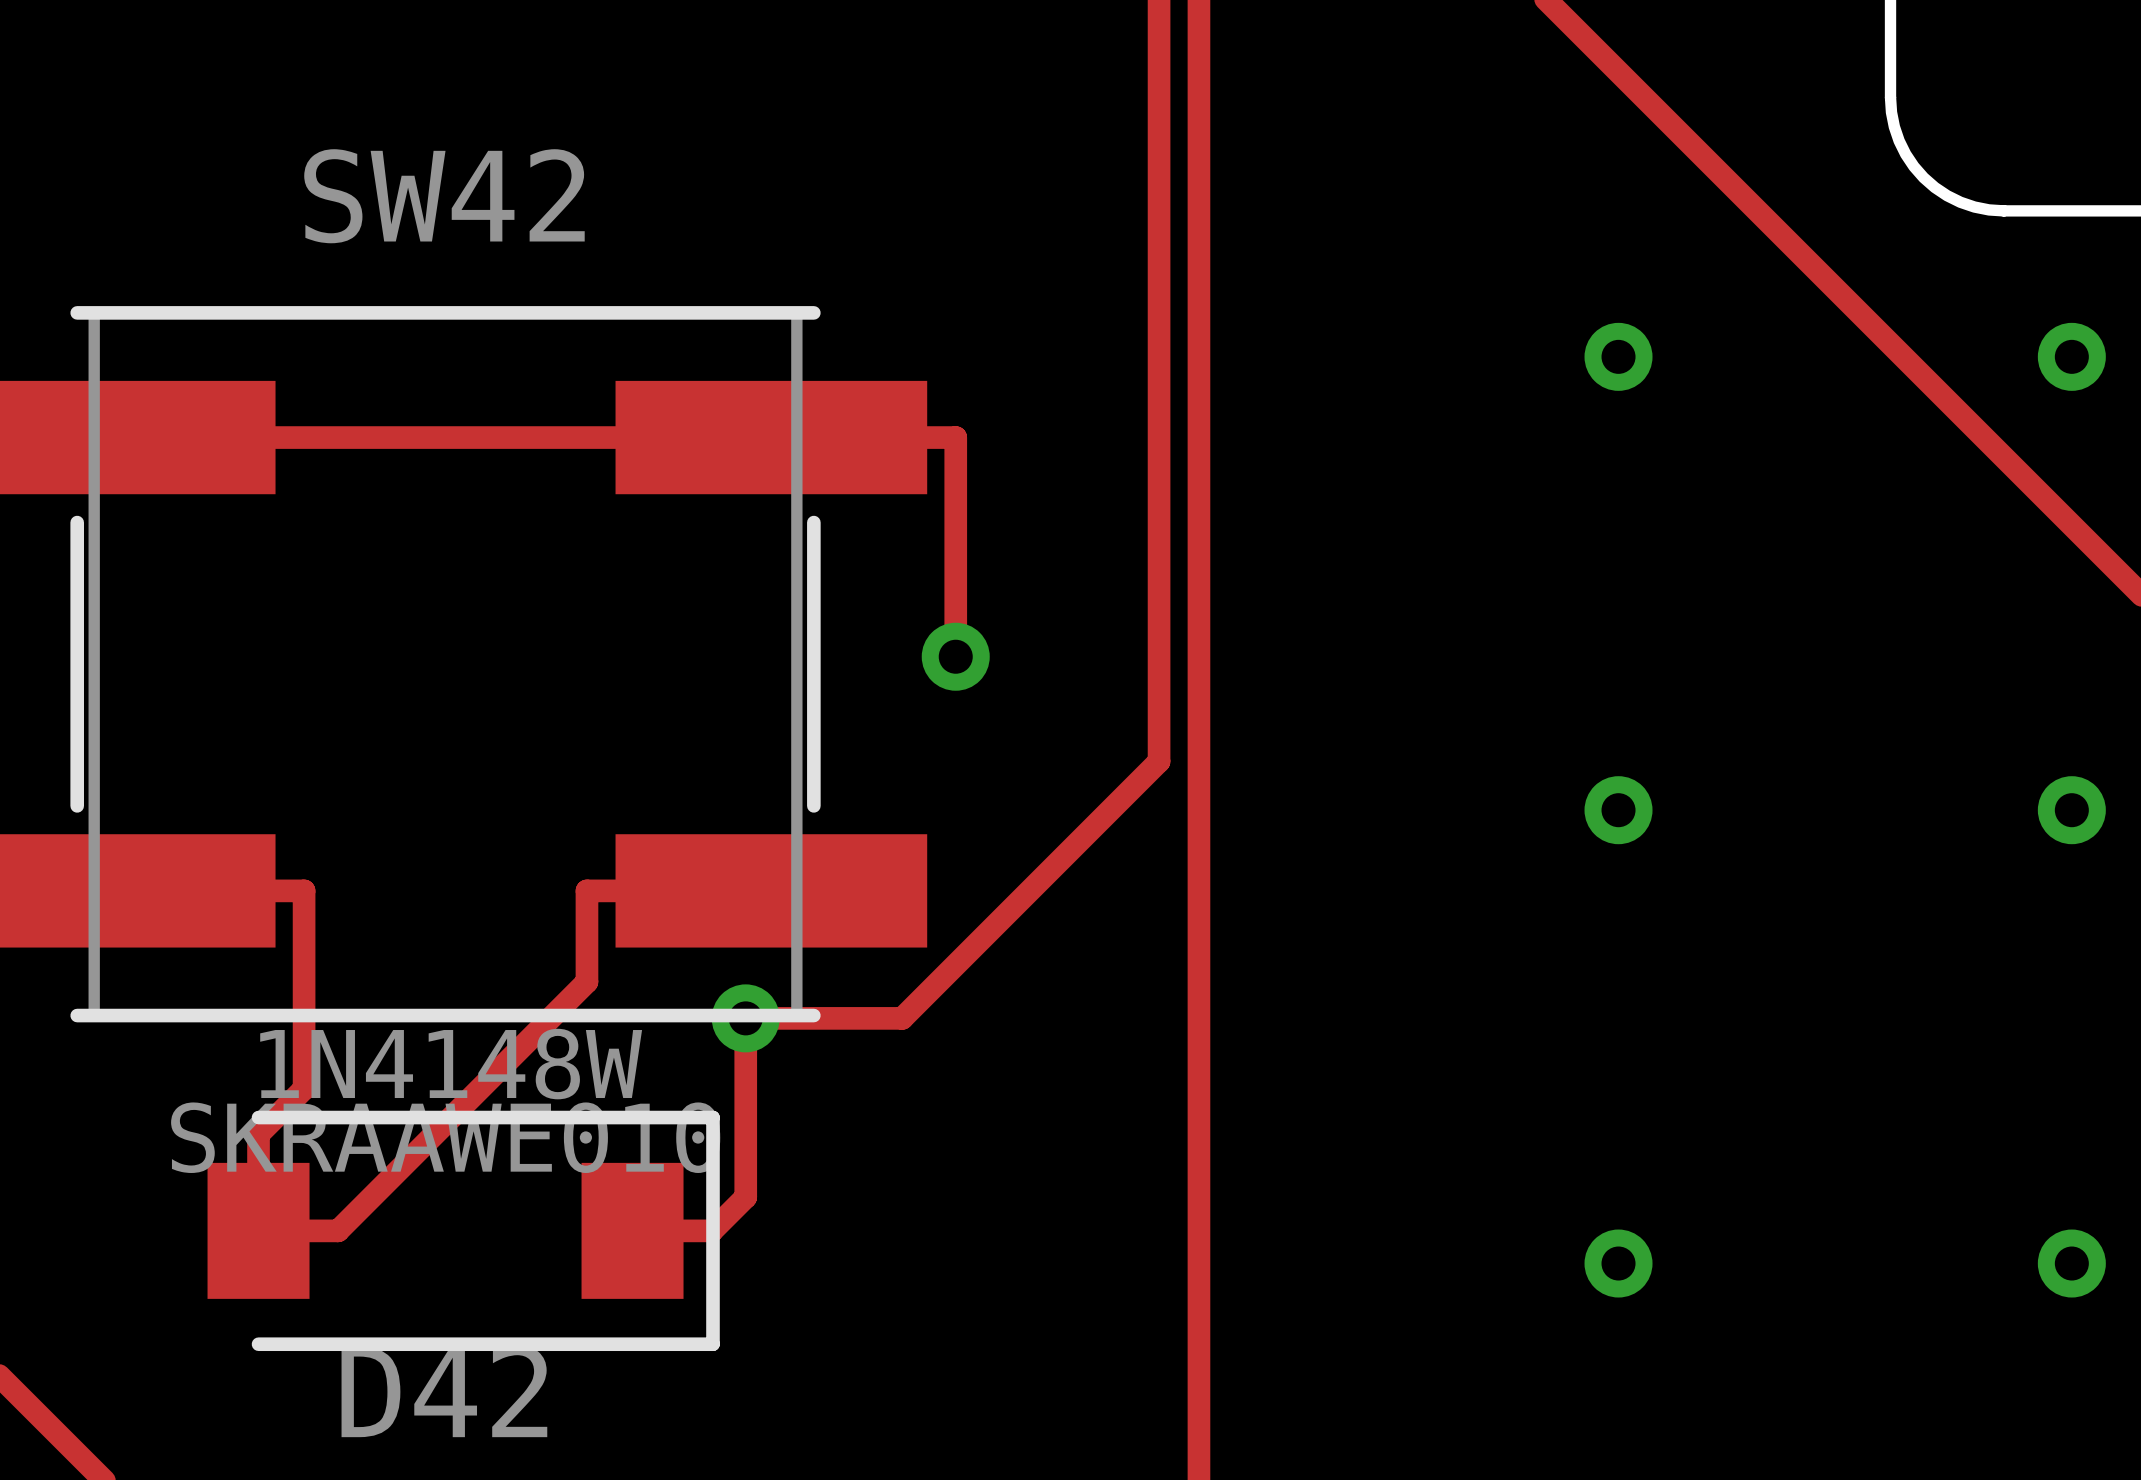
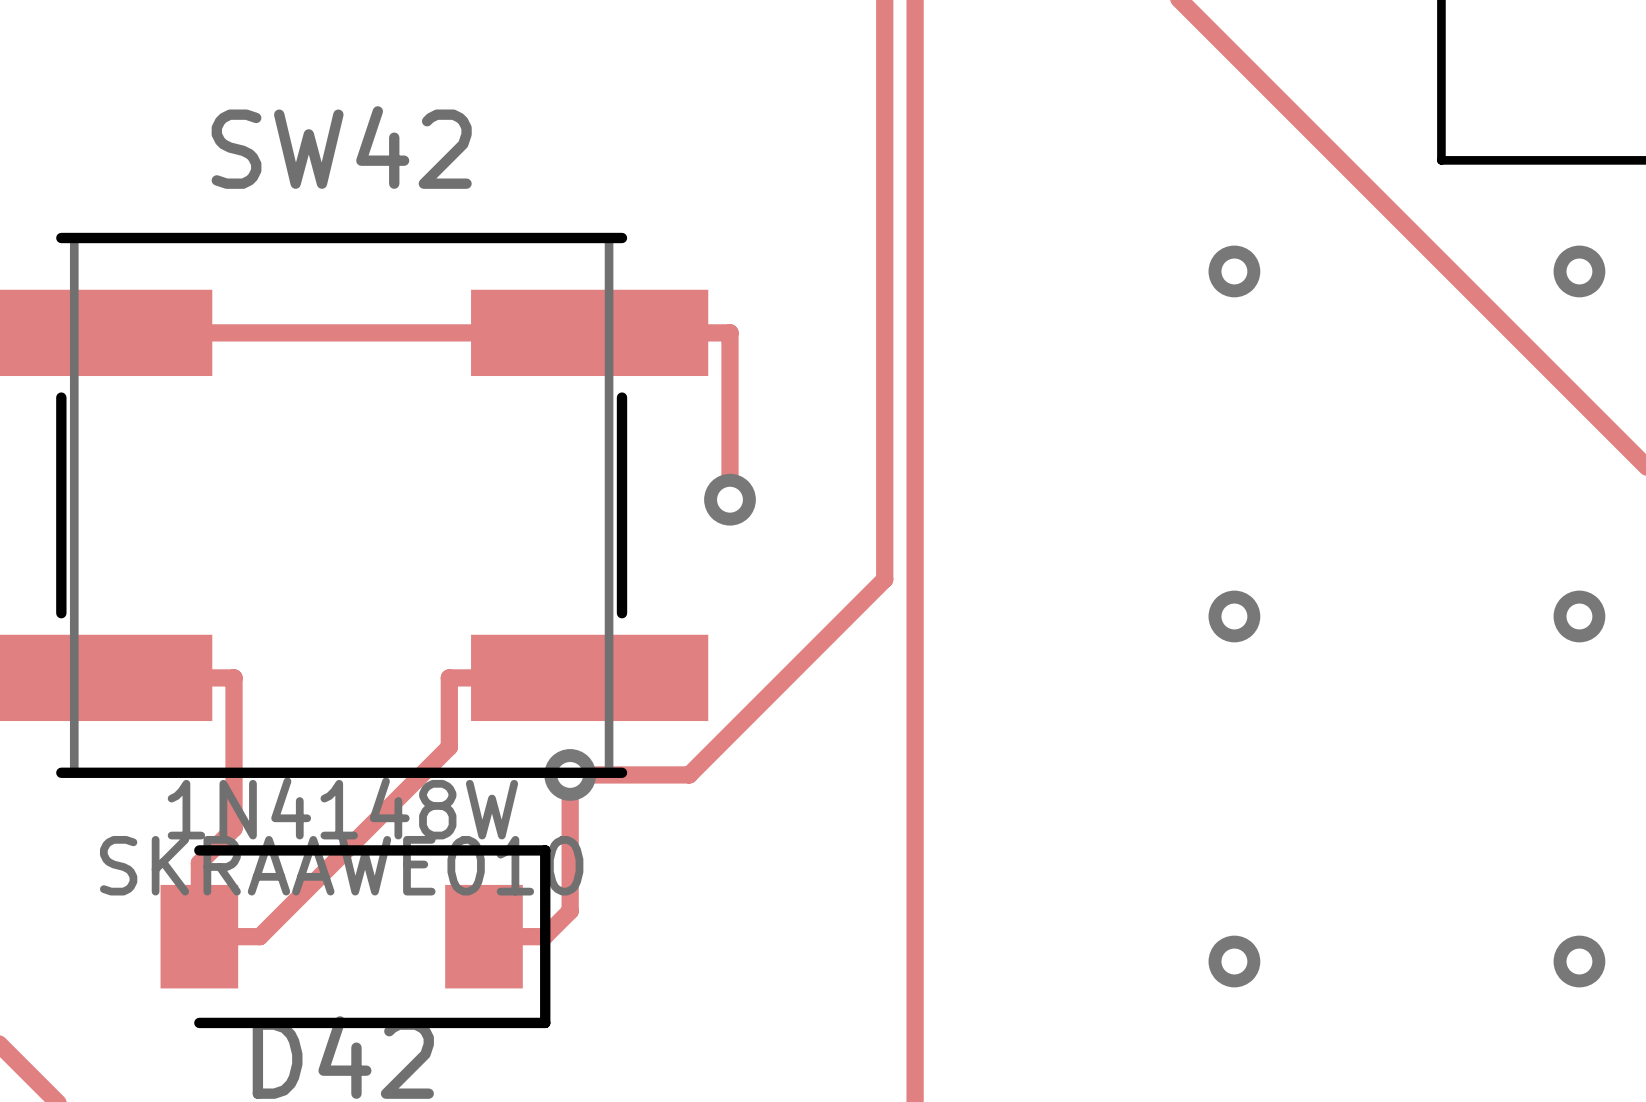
board edge: (1890, 97) (1894, 126) (1899, 140) (1905, 154) (1923, 177) (1947, 195) (1960, 202) (1989, 209) (2003, 210) -> (1441, 74) (1441, 160) (1527, 160)

